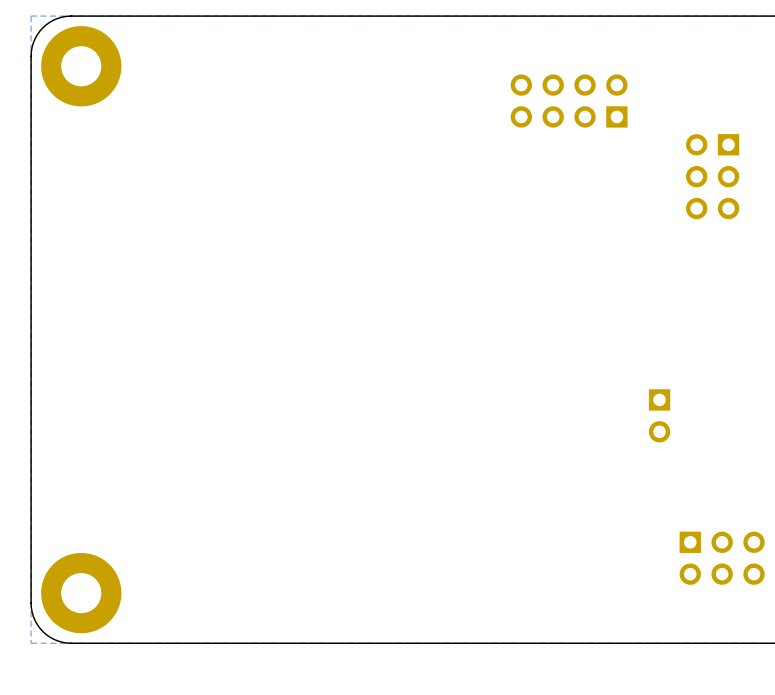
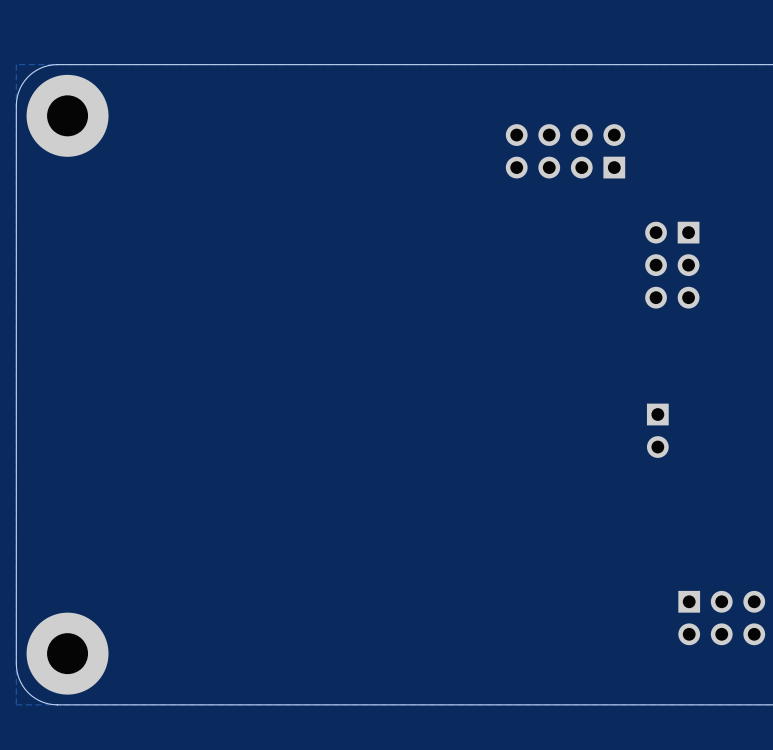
part position: (712, 176) -> (672, 265)
part position: (659, 415) -> (657, 430)

